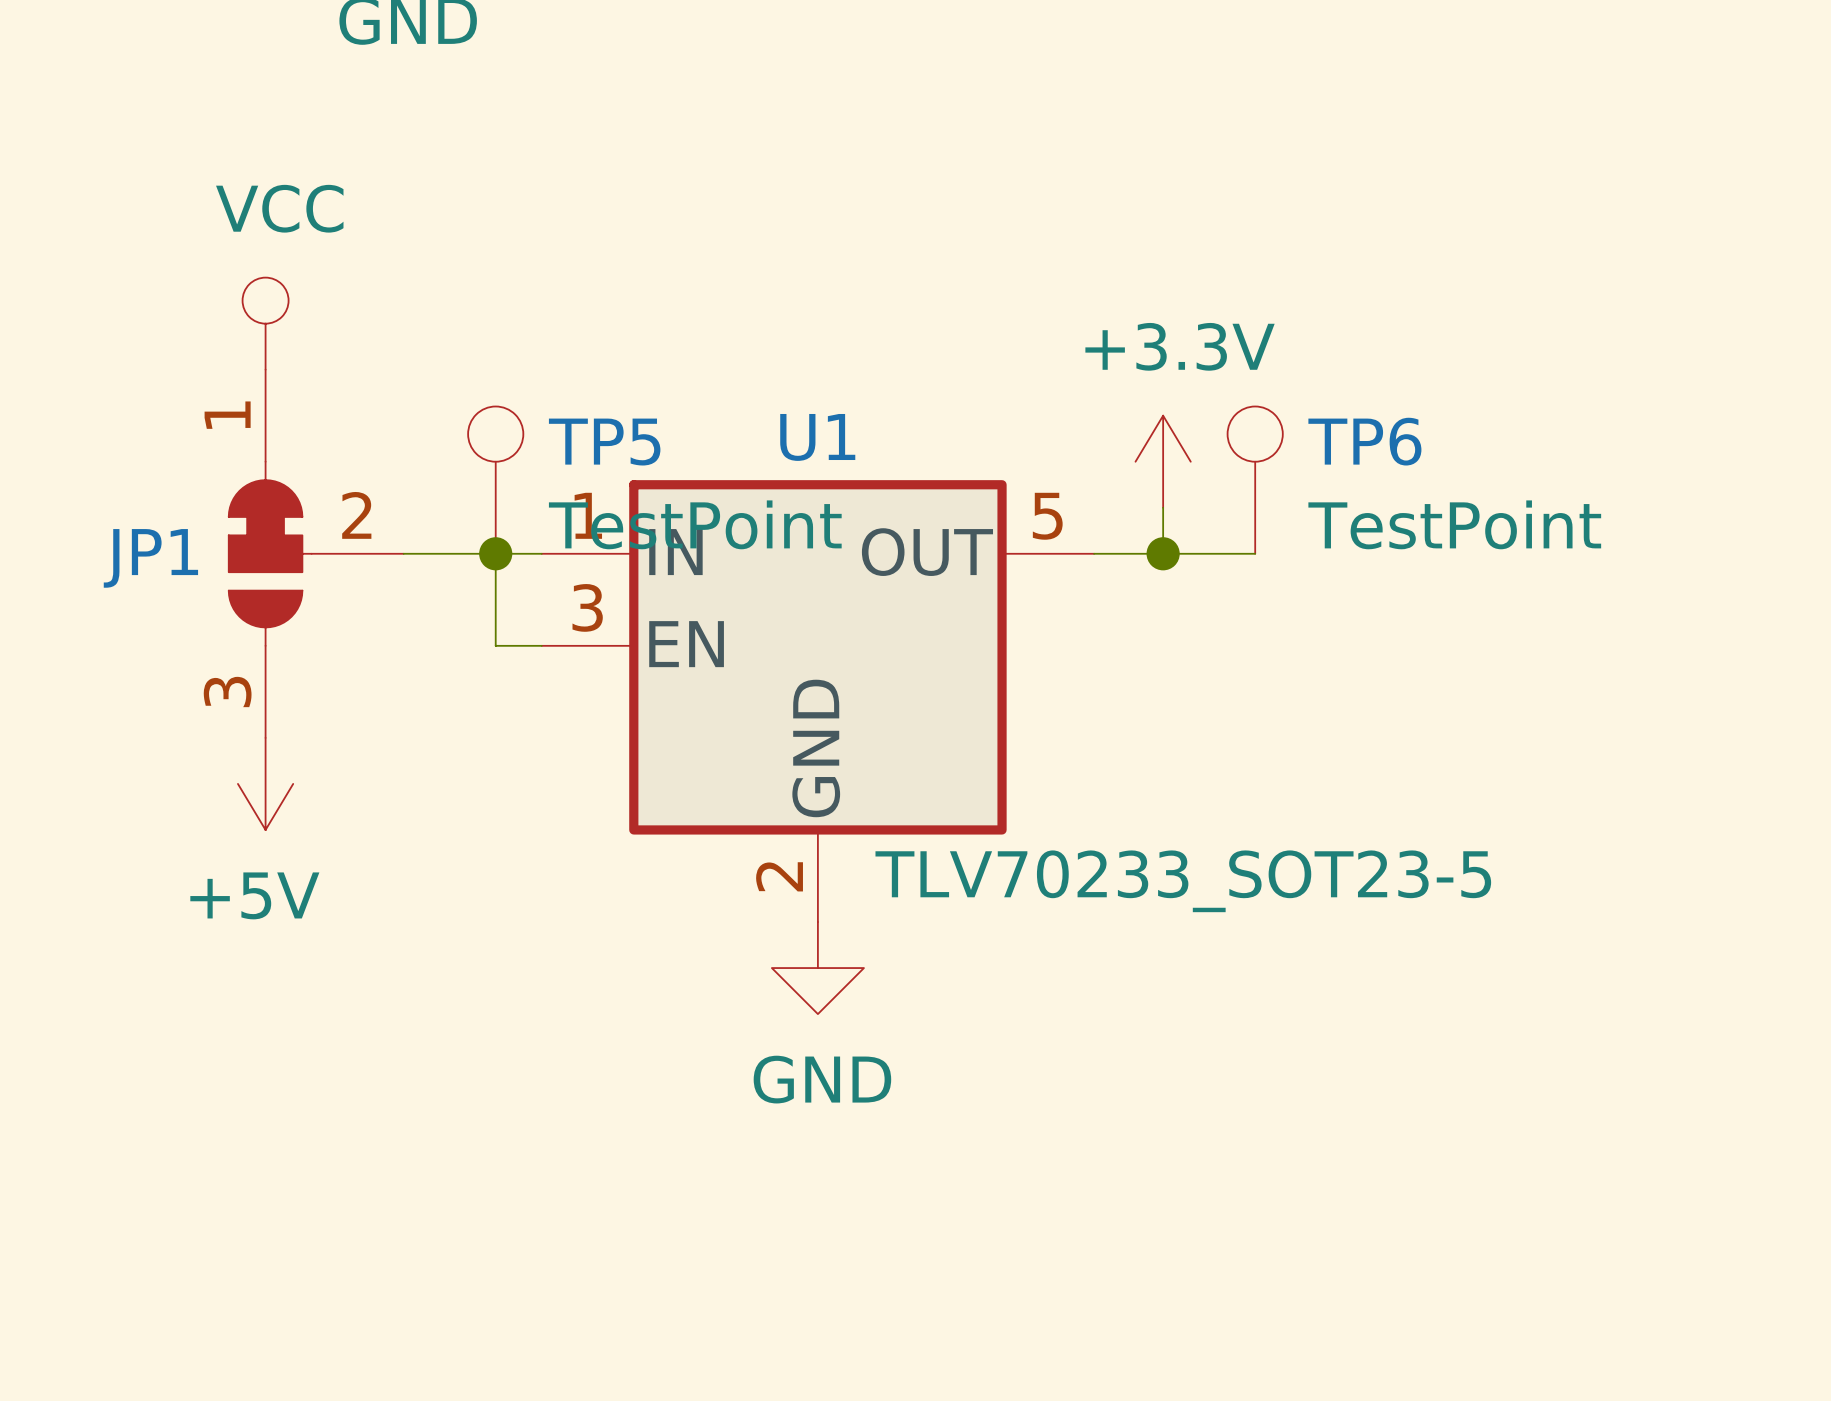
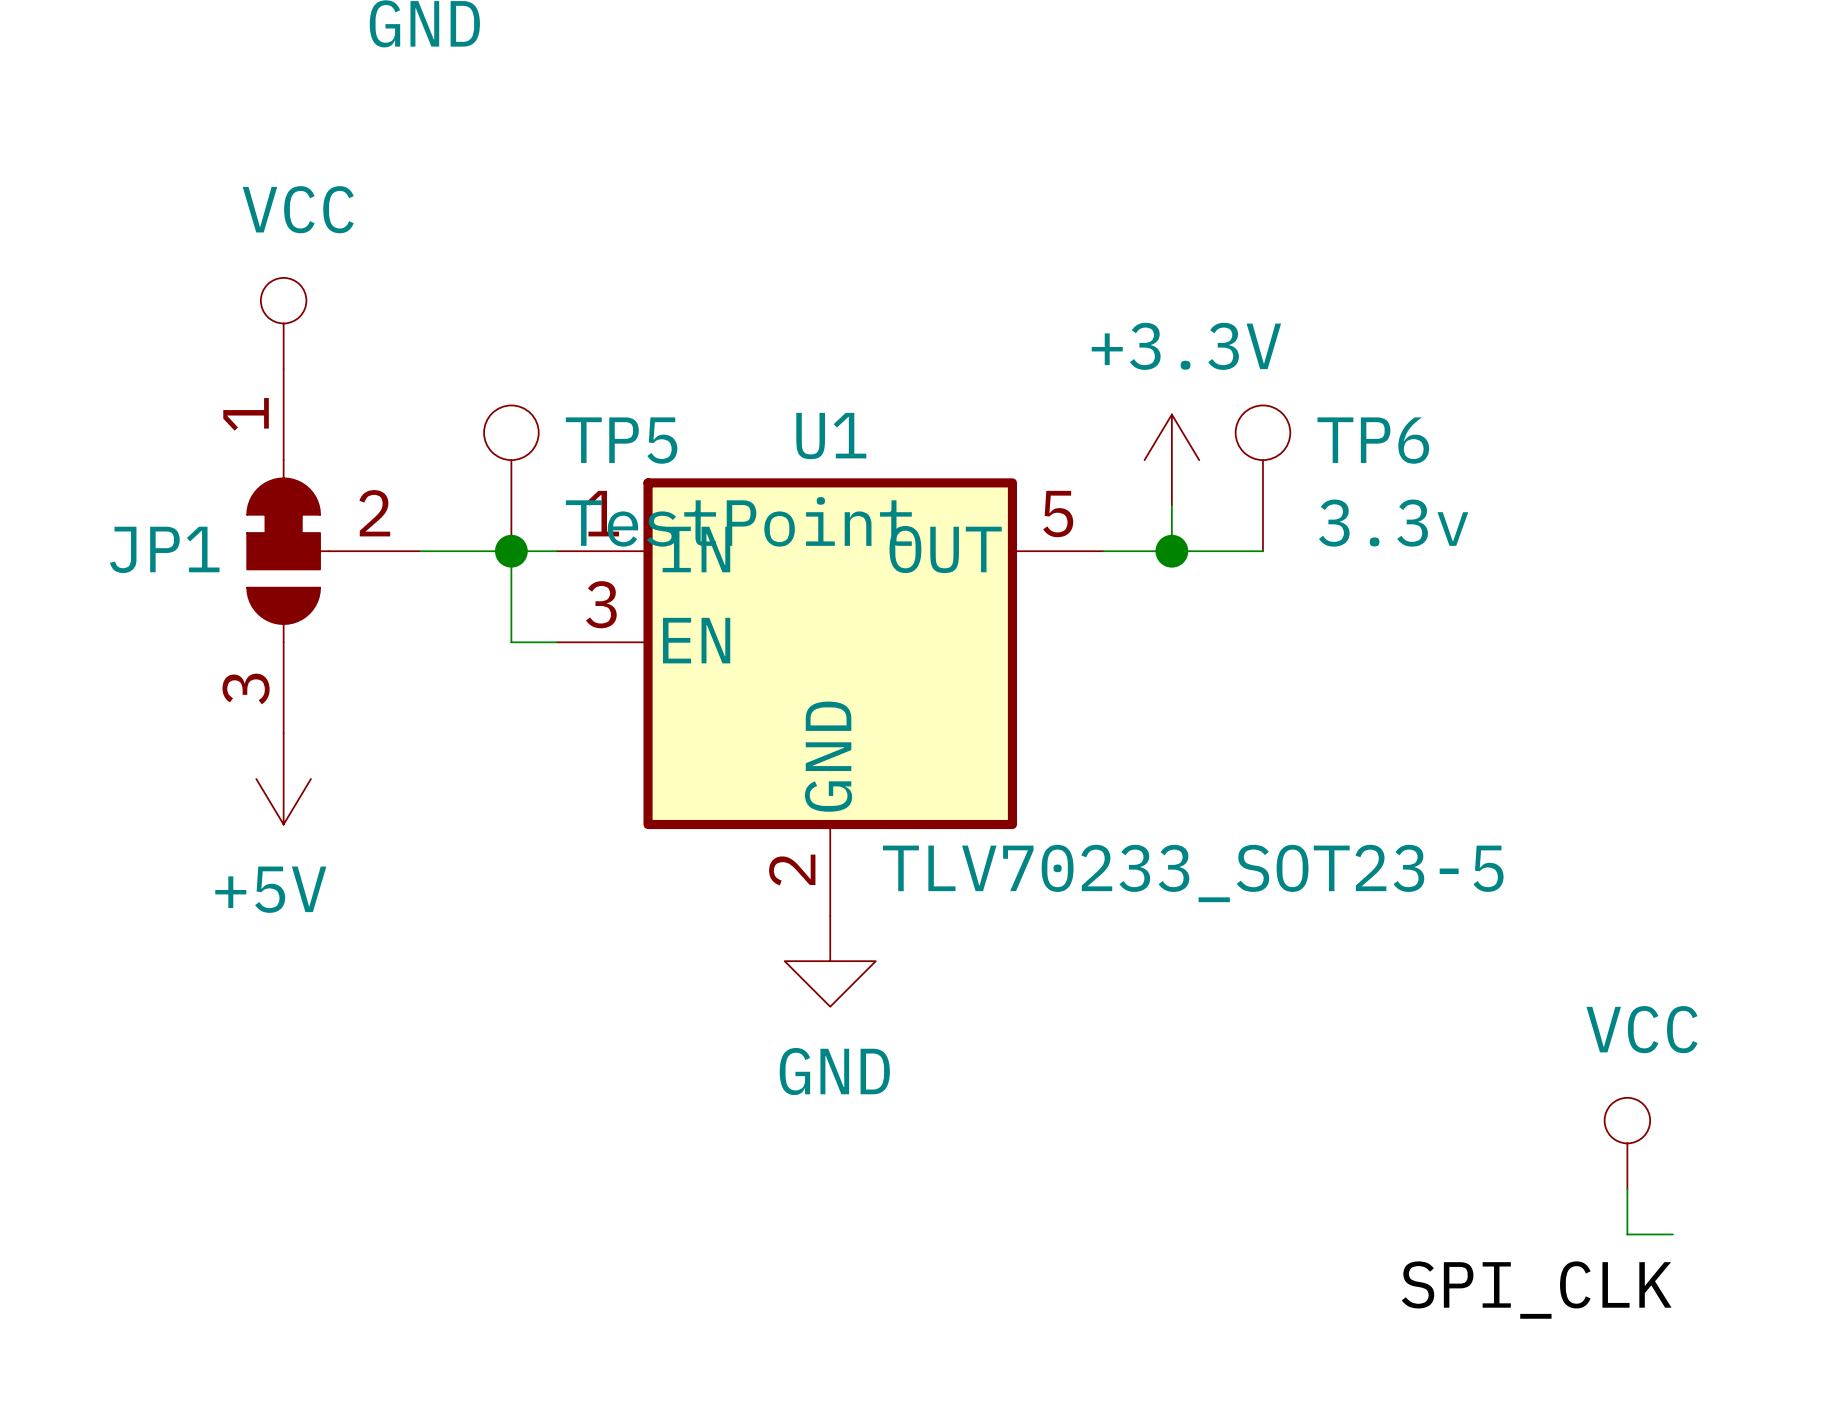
TP6 value: TestPoint (1454, 524) -> 3.3v (1393, 523)
power symbol: none -> VCC (1627, 1143)
wire: none -> (1627, 1188) (1627, 1234) (1672, 1234)
label: none -> SPI_CLK (1536, 1290)

